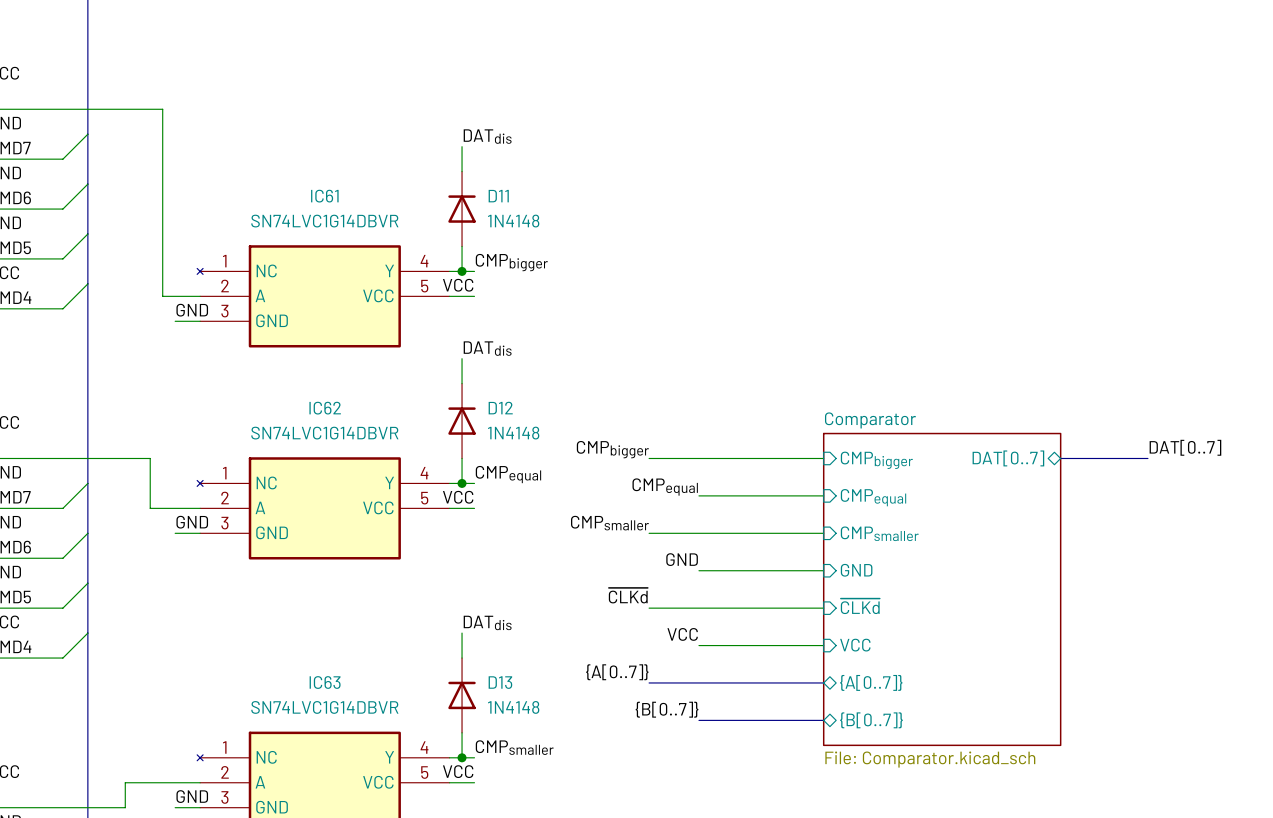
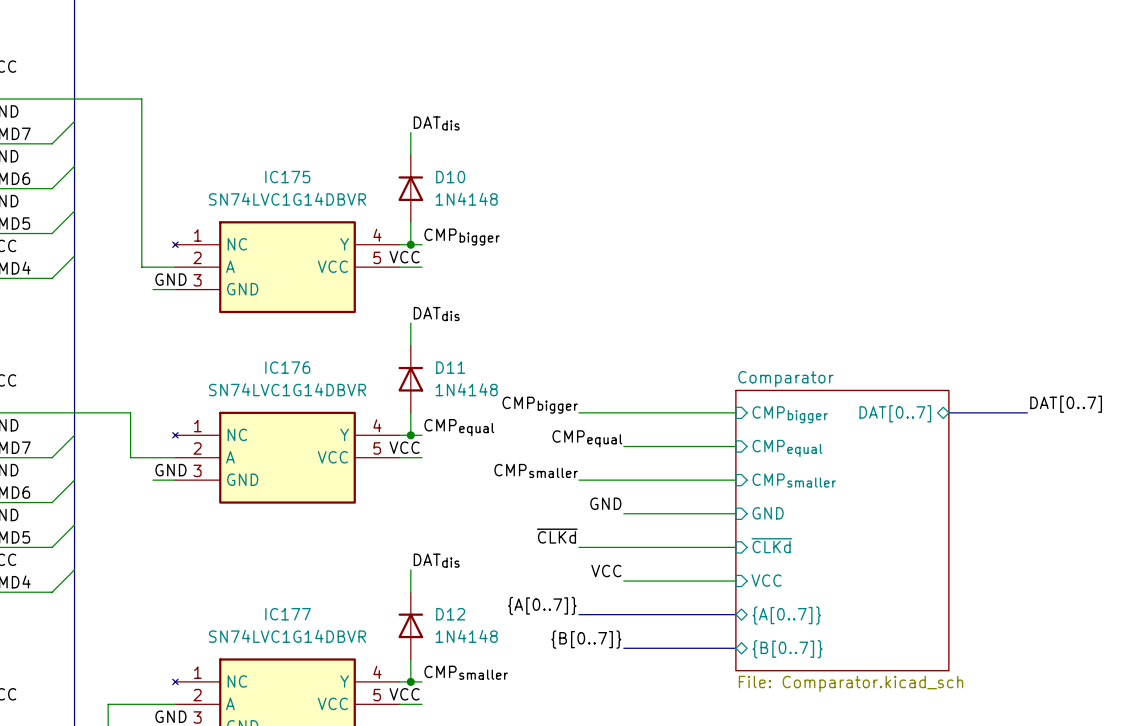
IC61 name: IC61 (324, 196) -> IC175 (287, 177)
D11 name: D11 (498, 196) -> D10 (450, 177)
IC62 name: IC62 (325, 408) -> IC176 (287, 367)
D12 name: D12 (500, 408) -> D11 (450, 367)
IC63 name: IC63 (325, 682) -> IC177 (288, 614)
D13 name: D13 (500, 682) -> D12 (450, 614)

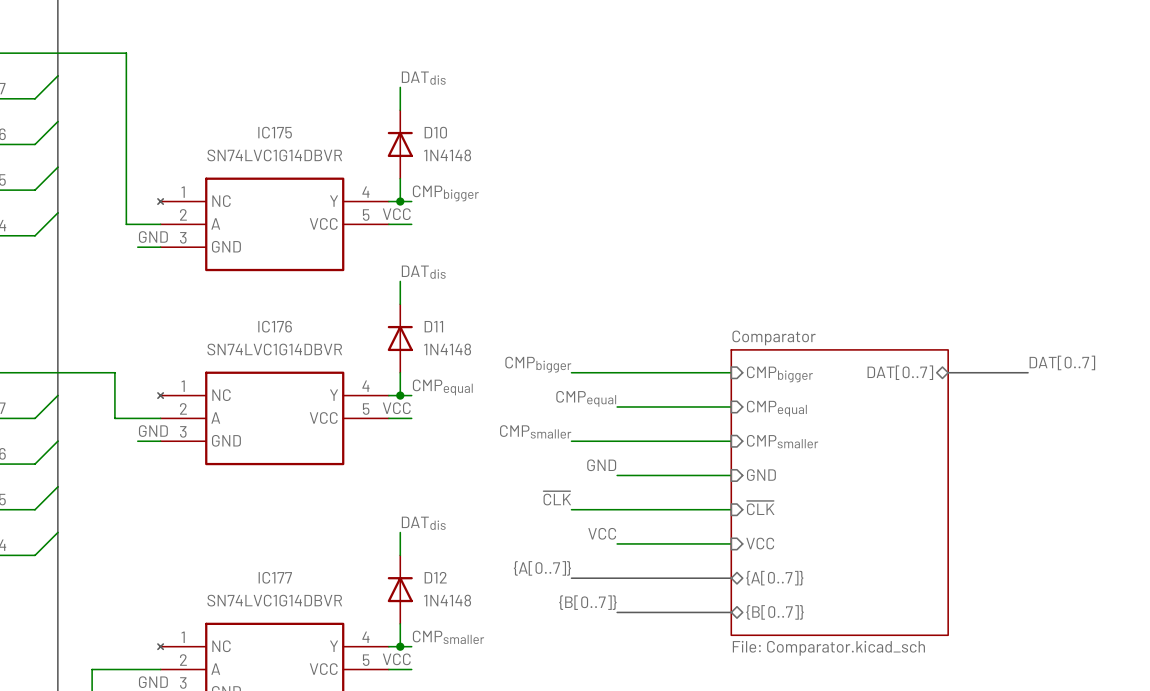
label: ~{CLKd} (557, 536) -> ~{CLK} (557, 498)
sheet pin: ~{CLKd} (771, 545) -> ~{CLK} (760, 508)

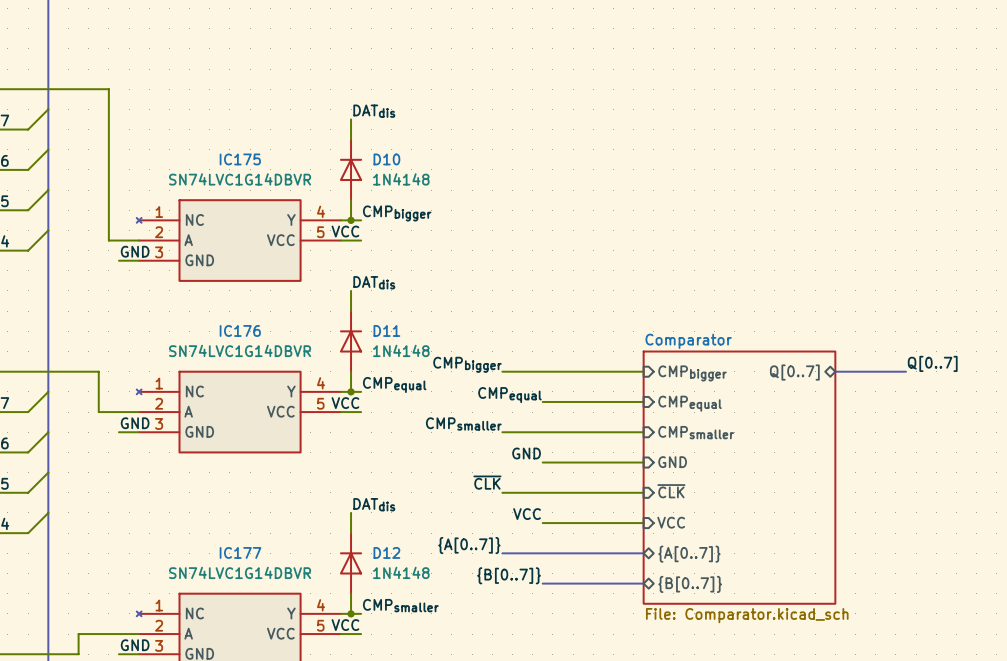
label: DAT[0..7] (1062, 362) -> Q[0..7] (932, 363)
sheet pin: DAT[0..7] (900, 372) -> Q[0..7] (794, 372)

